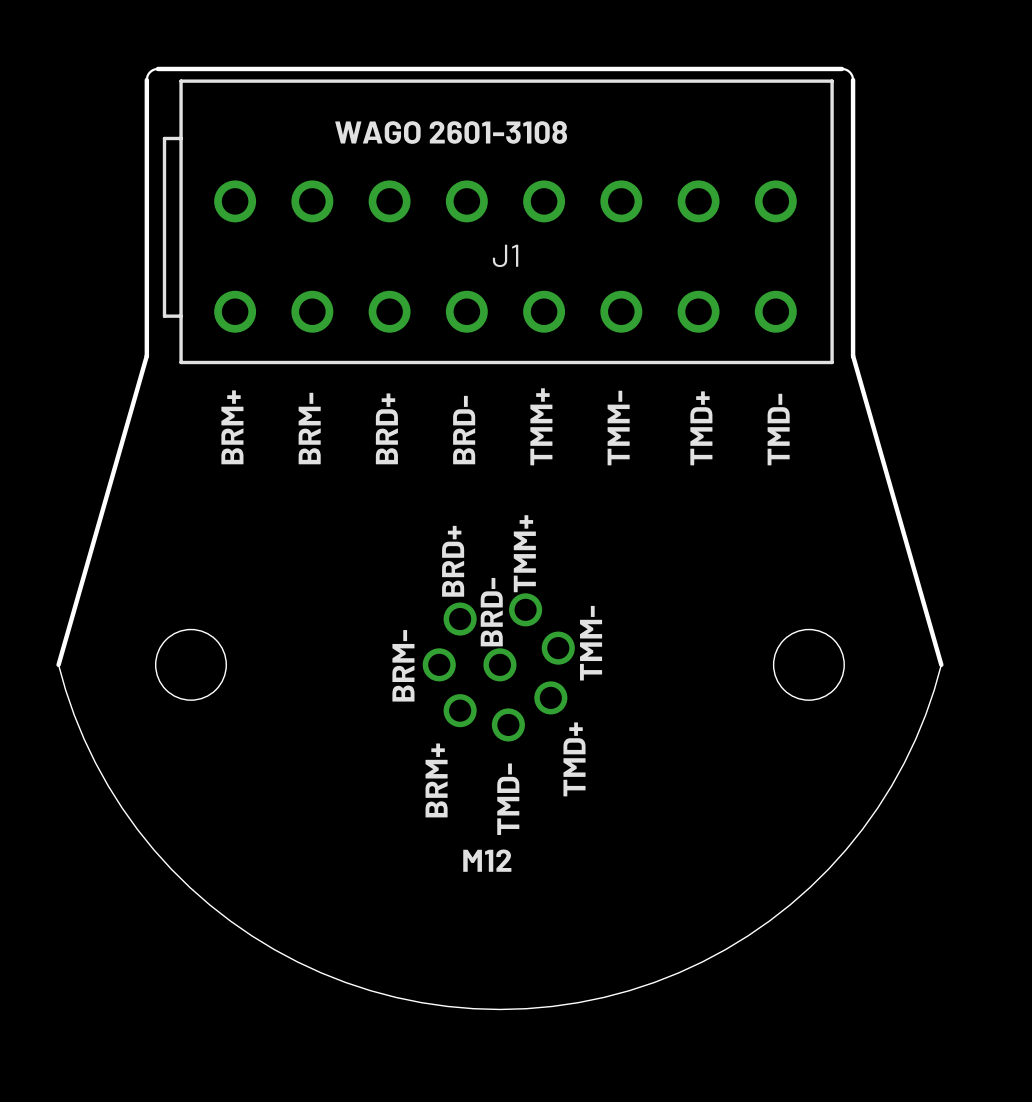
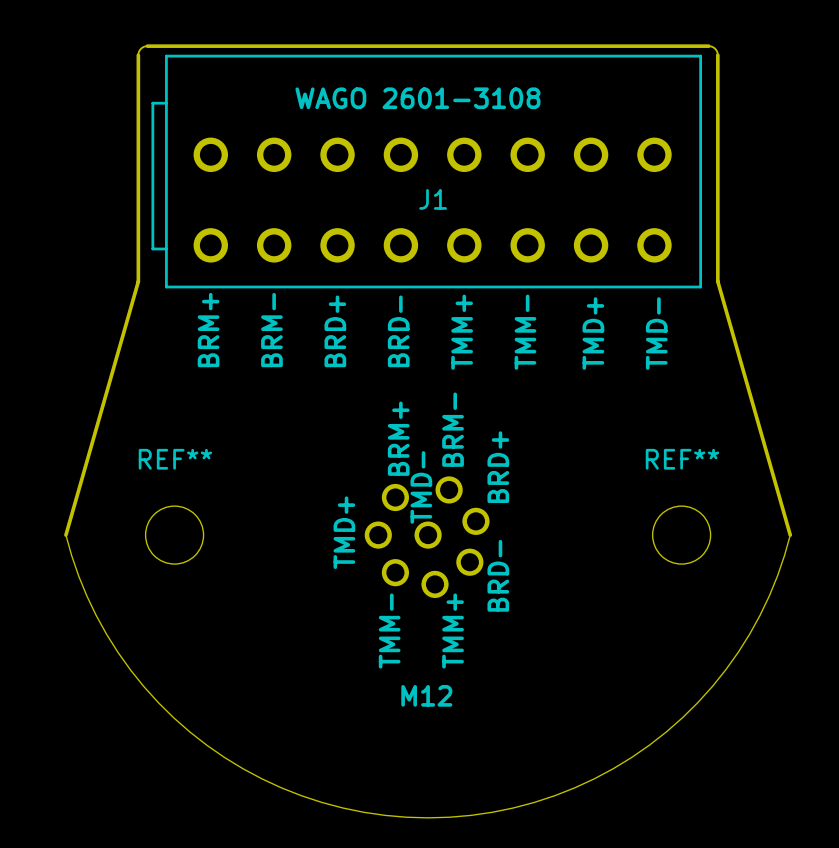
text position: TMM+ (524, 553) -> TMM+ (453, 631)
text position: BRD+ (453, 561) -> BRD+ (498, 467)
REF** name: none -> REF** (175, 459)
REF** name: none -> REF** (682, 459)
text position: BRD- (491, 612) -> BRD- (498, 575)
text position: TMM- (591, 643) -> TMM- (389, 631)
text position: BRM- (403, 665) -> BRM- (453, 429)
text position: TMD+ (574, 759) -> TMD+ (344, 532)
text position: BRM+ (436, 780) -> BRM+ (398, 438)
text position: TMD- (508, 799) -> TMD- (421, 487)

